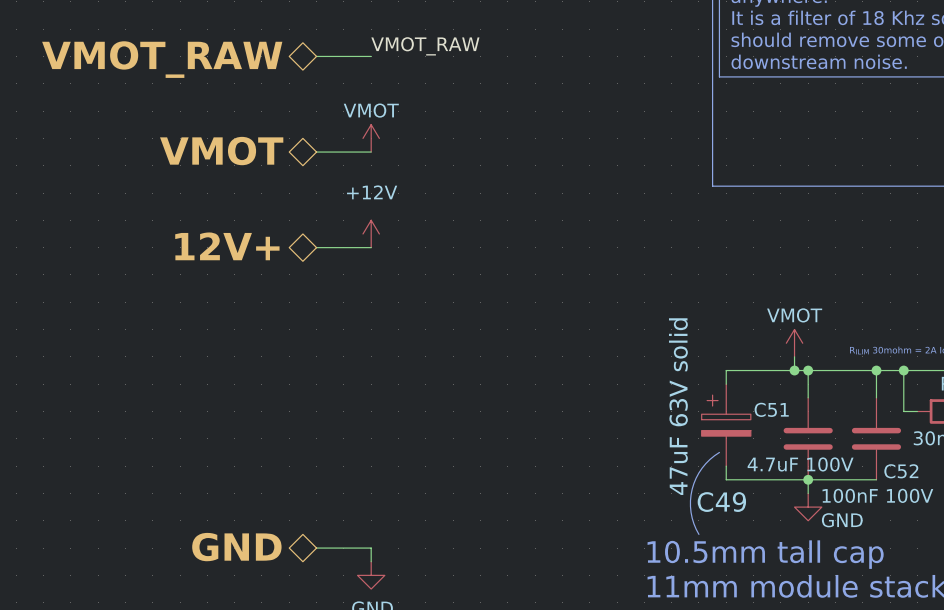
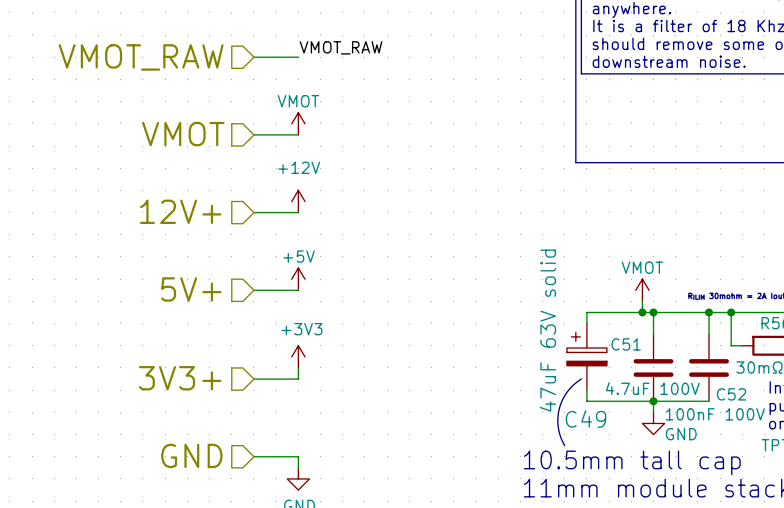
hierarchical label shape: bidirectional (162, 59) -> input (141, 57)
hierarchical label shape: bidirectional (221, 151) -> input (183, 134)
hierarchical label shape: bidirectional (227, 246) -> input (180, 211)
power symbol: none -> +5V (298, 279)
hierarchical label: none -> 5V+ (191, 289)
wire: none -> (253, 290) (298, 290)
power symbol: none -> +3V3 (298, 356)
wire: none -> (298, 367) (298, 379) (253, 379)
hierarchical label: none -> 3V3+ (180, 378)
hierarchical label shape: bidirectional (236, 547) -> input (191, 455)

